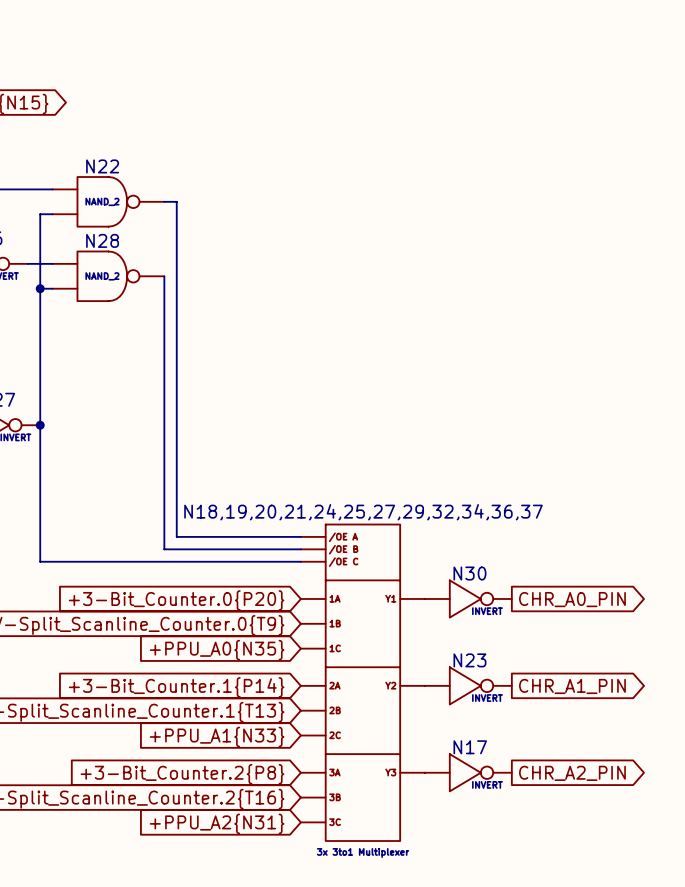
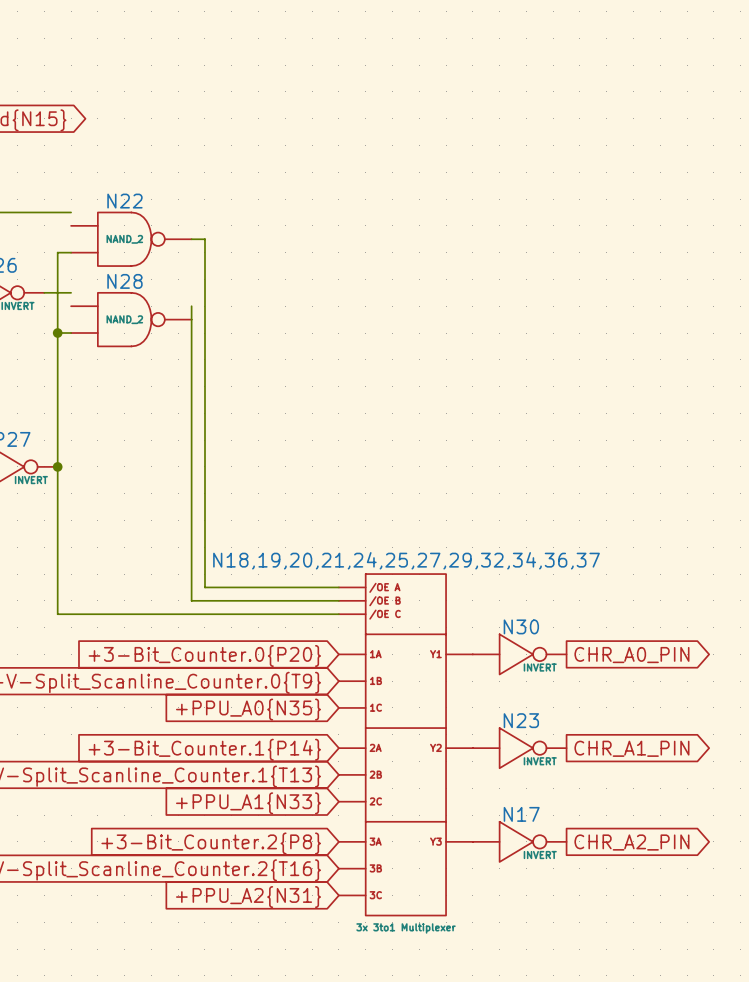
N22 position: (108, 201) -> (131, 239)
wire: (164, 201) (176, 201) (176, 214) -> (191, 239) (204, 239)
wire: (52, 214) (40, 214) (40, 226) -> (71, 252) (57, 252)
N28 position: (108, 276) -> (131, 319)
wire: (40, 288) (52, 288) -> (57, 333) (71, 333)
junction position: (40, 288) -> (57, 333)

